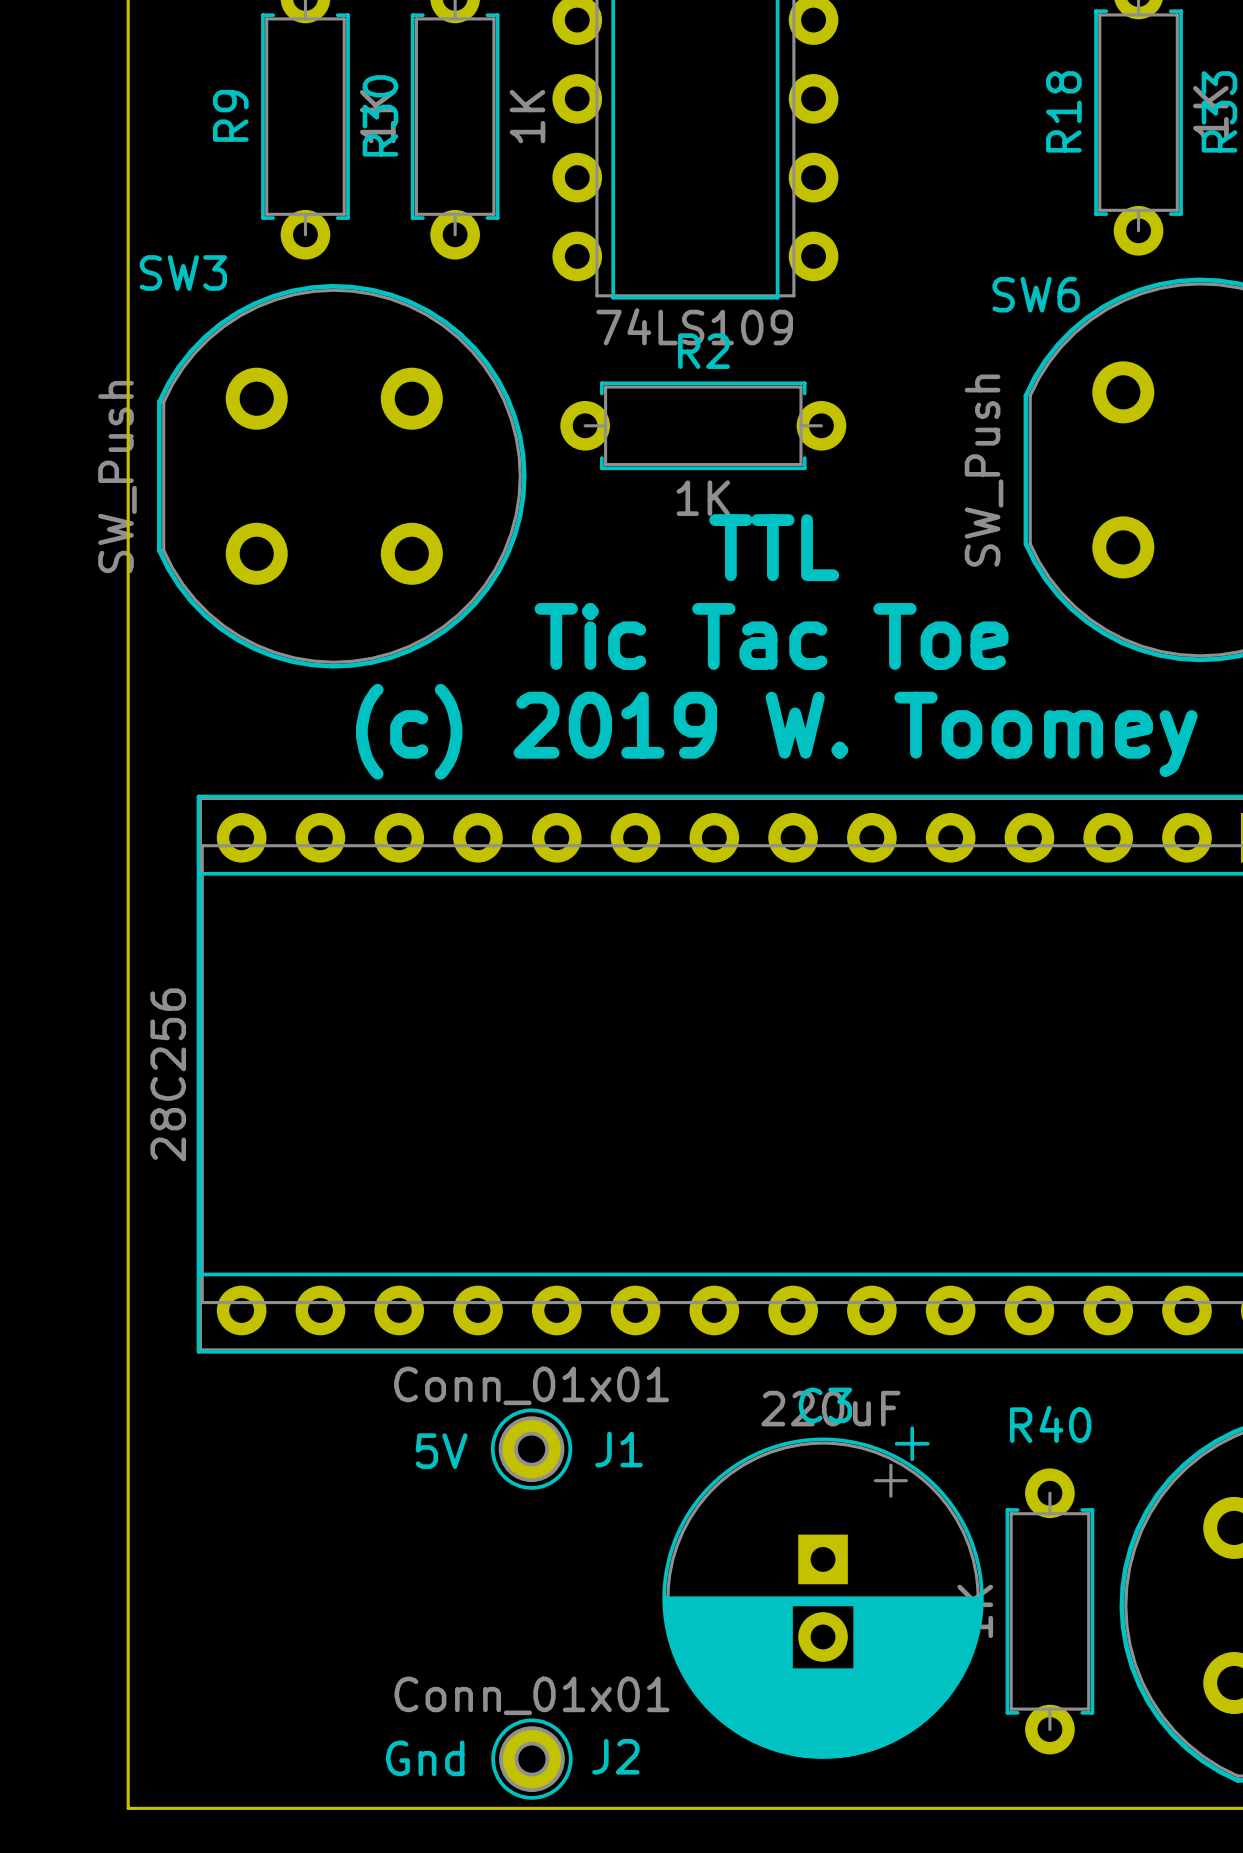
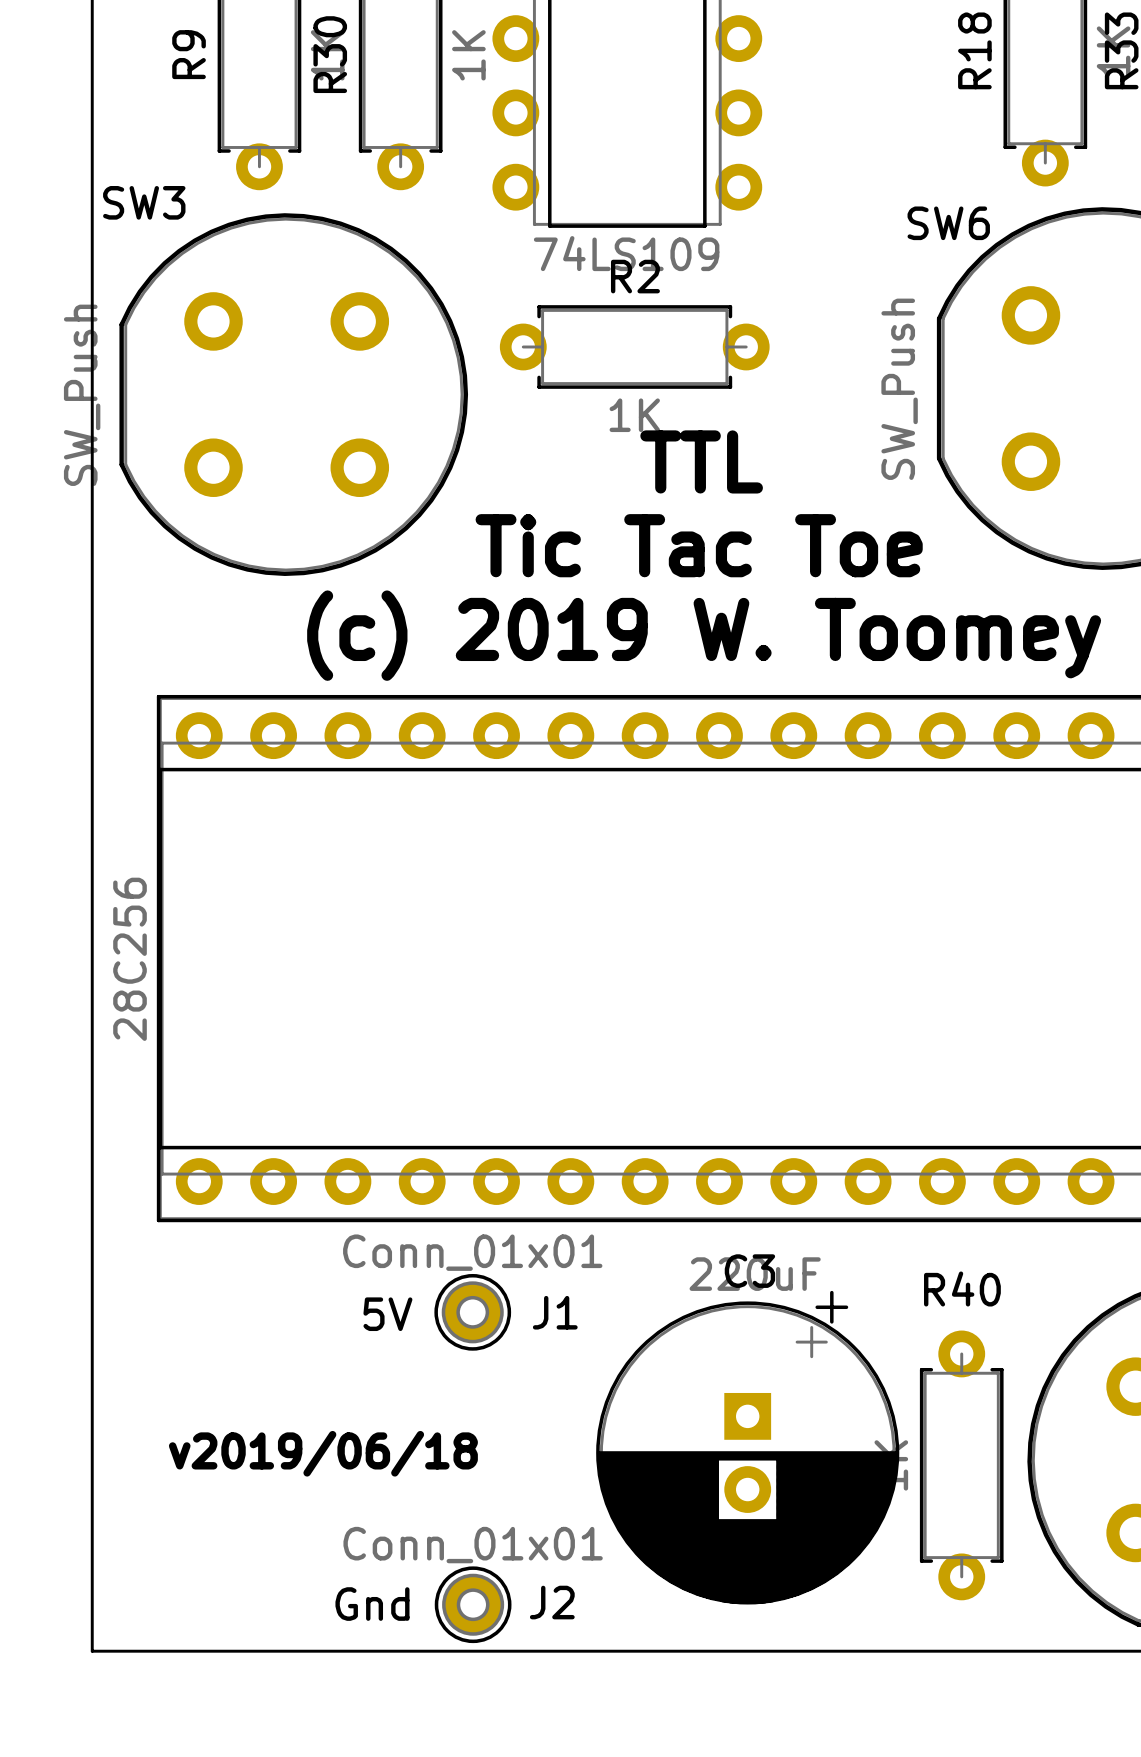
text: none -> v2019/06/18 (323, 1453)

